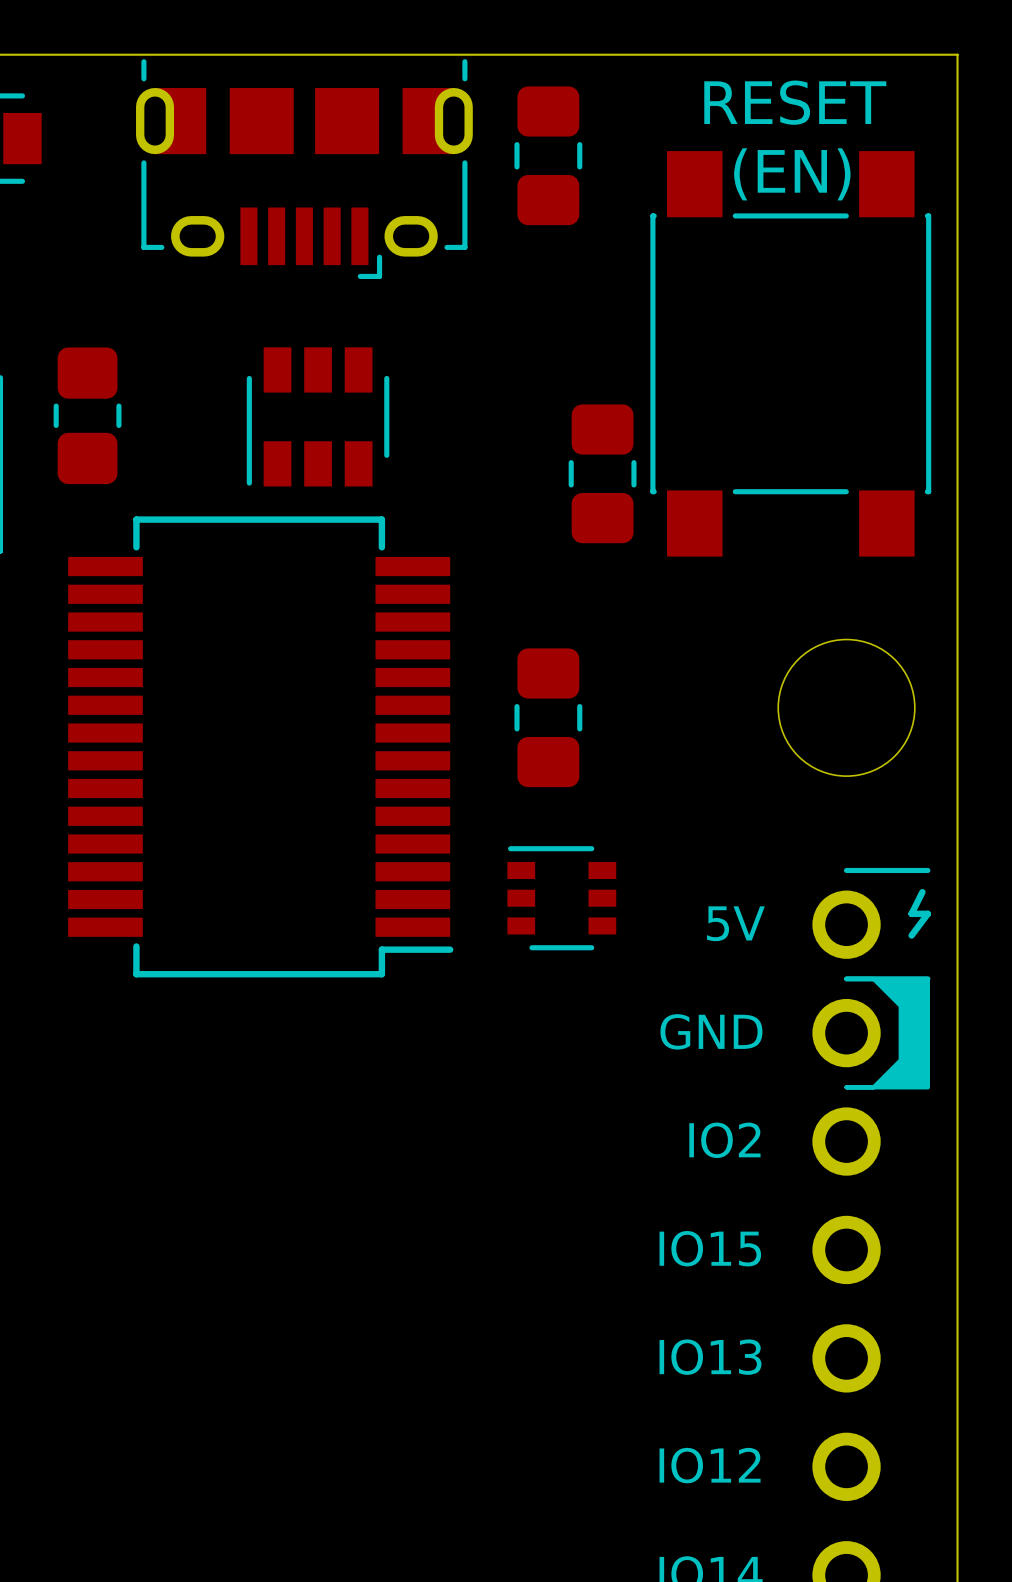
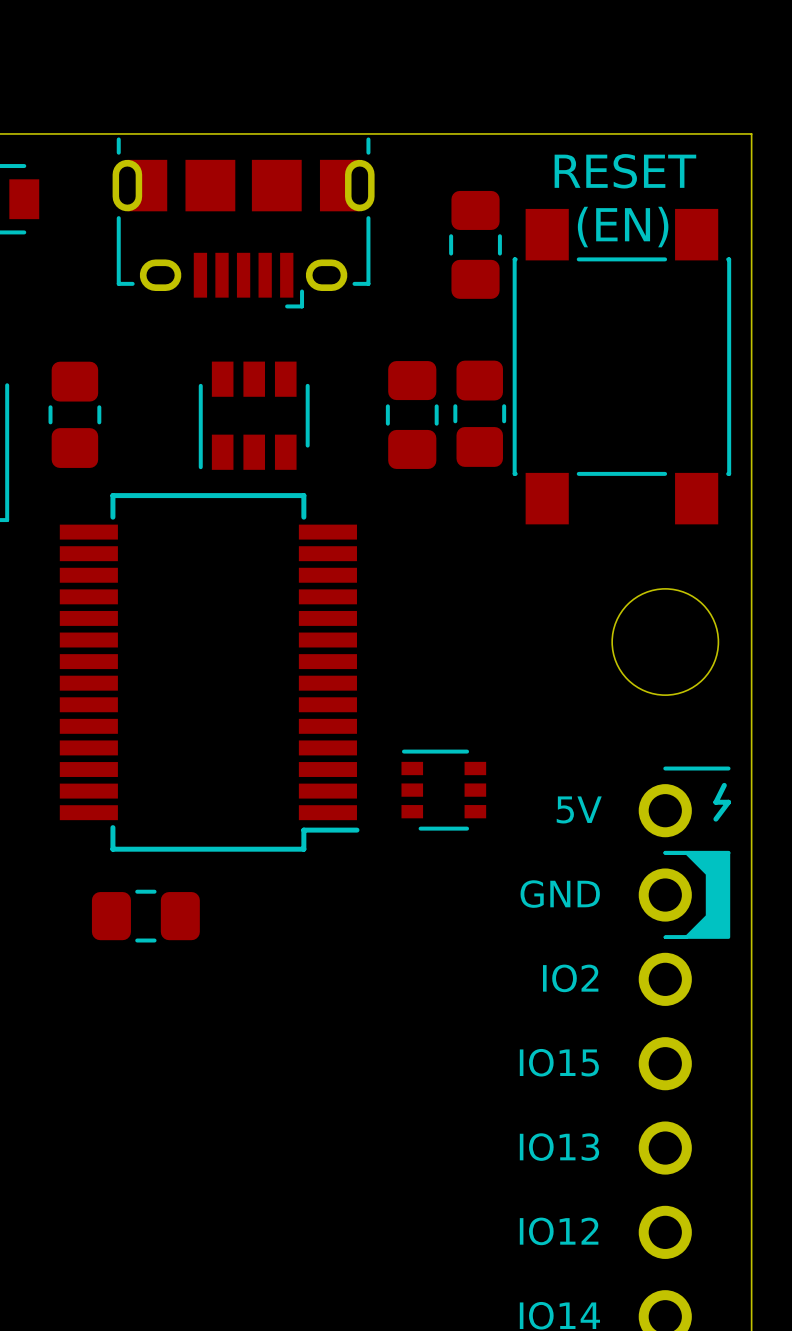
part position: (548, 155) -> (475, 244)
part: none -> (479, 413)
part position: (602, 473) -> (412, 415)
part: (548, 717) -> none
part: none -> (145, 916)

